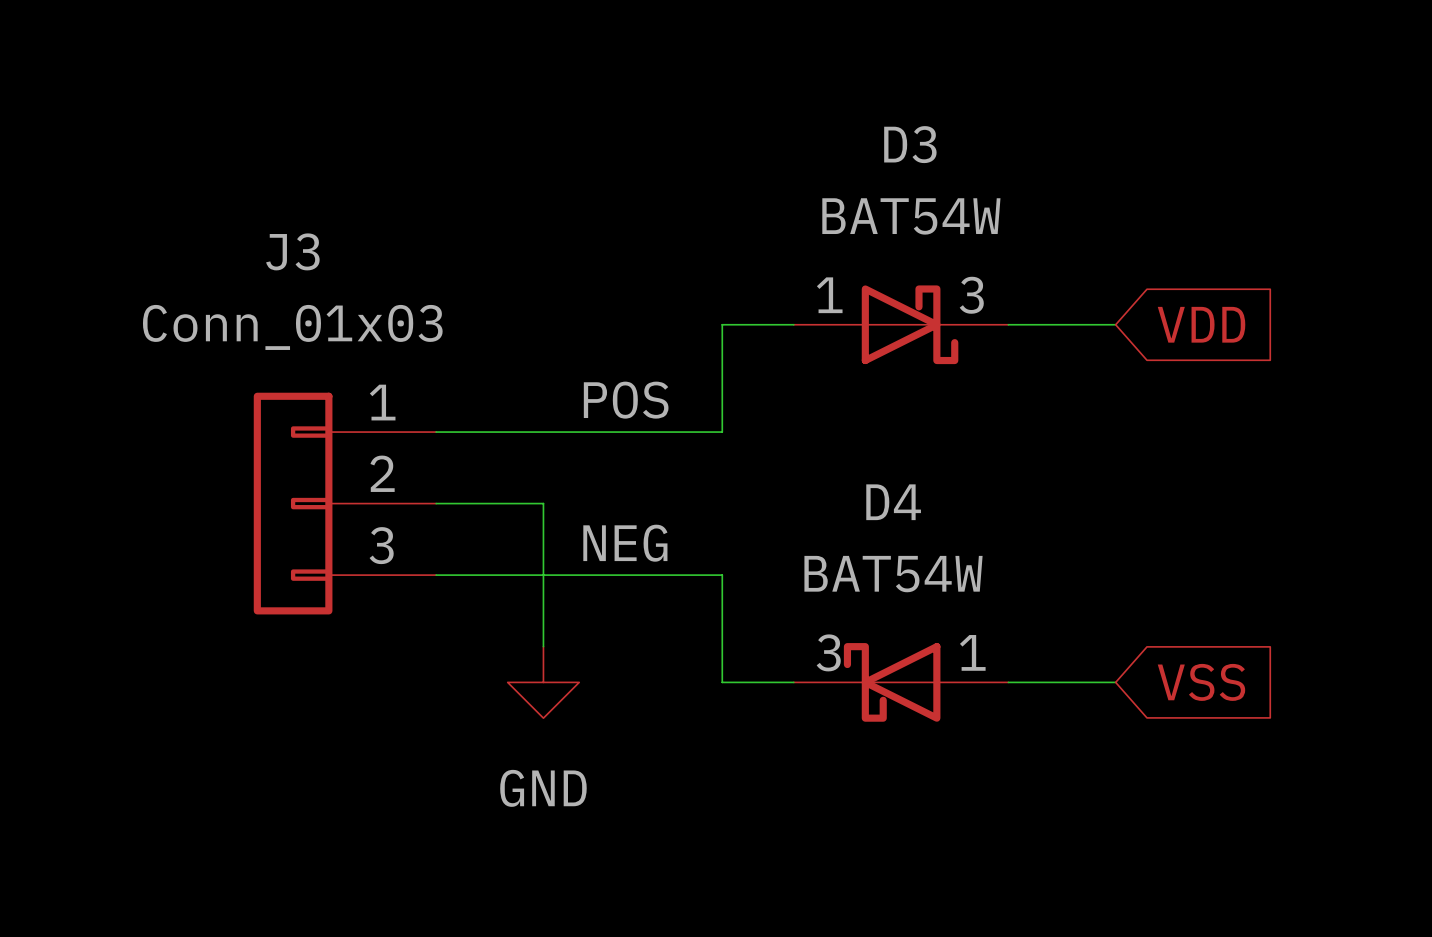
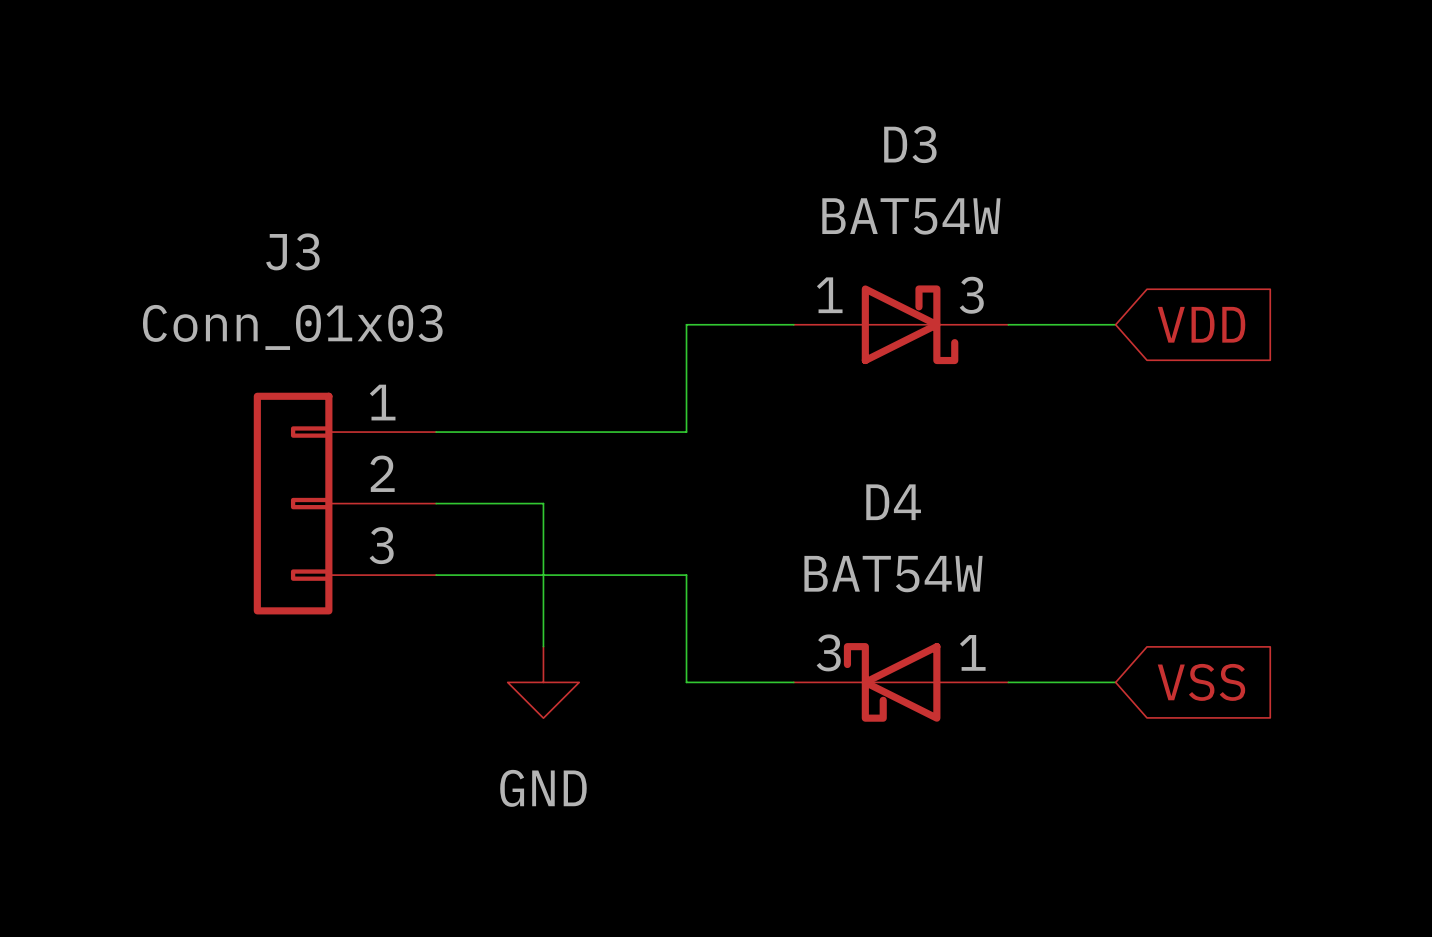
wire: (722, 324) (722, 432) (686, 432) -> (722, 324) (686, 324) (686, 432)
label: POS (626, 400) -> none
label: NEG (625, 543) -> none
wire: (686, 575) (722, 575) (722, 682) -> (686, 575) (686, 682) (722, 682)

